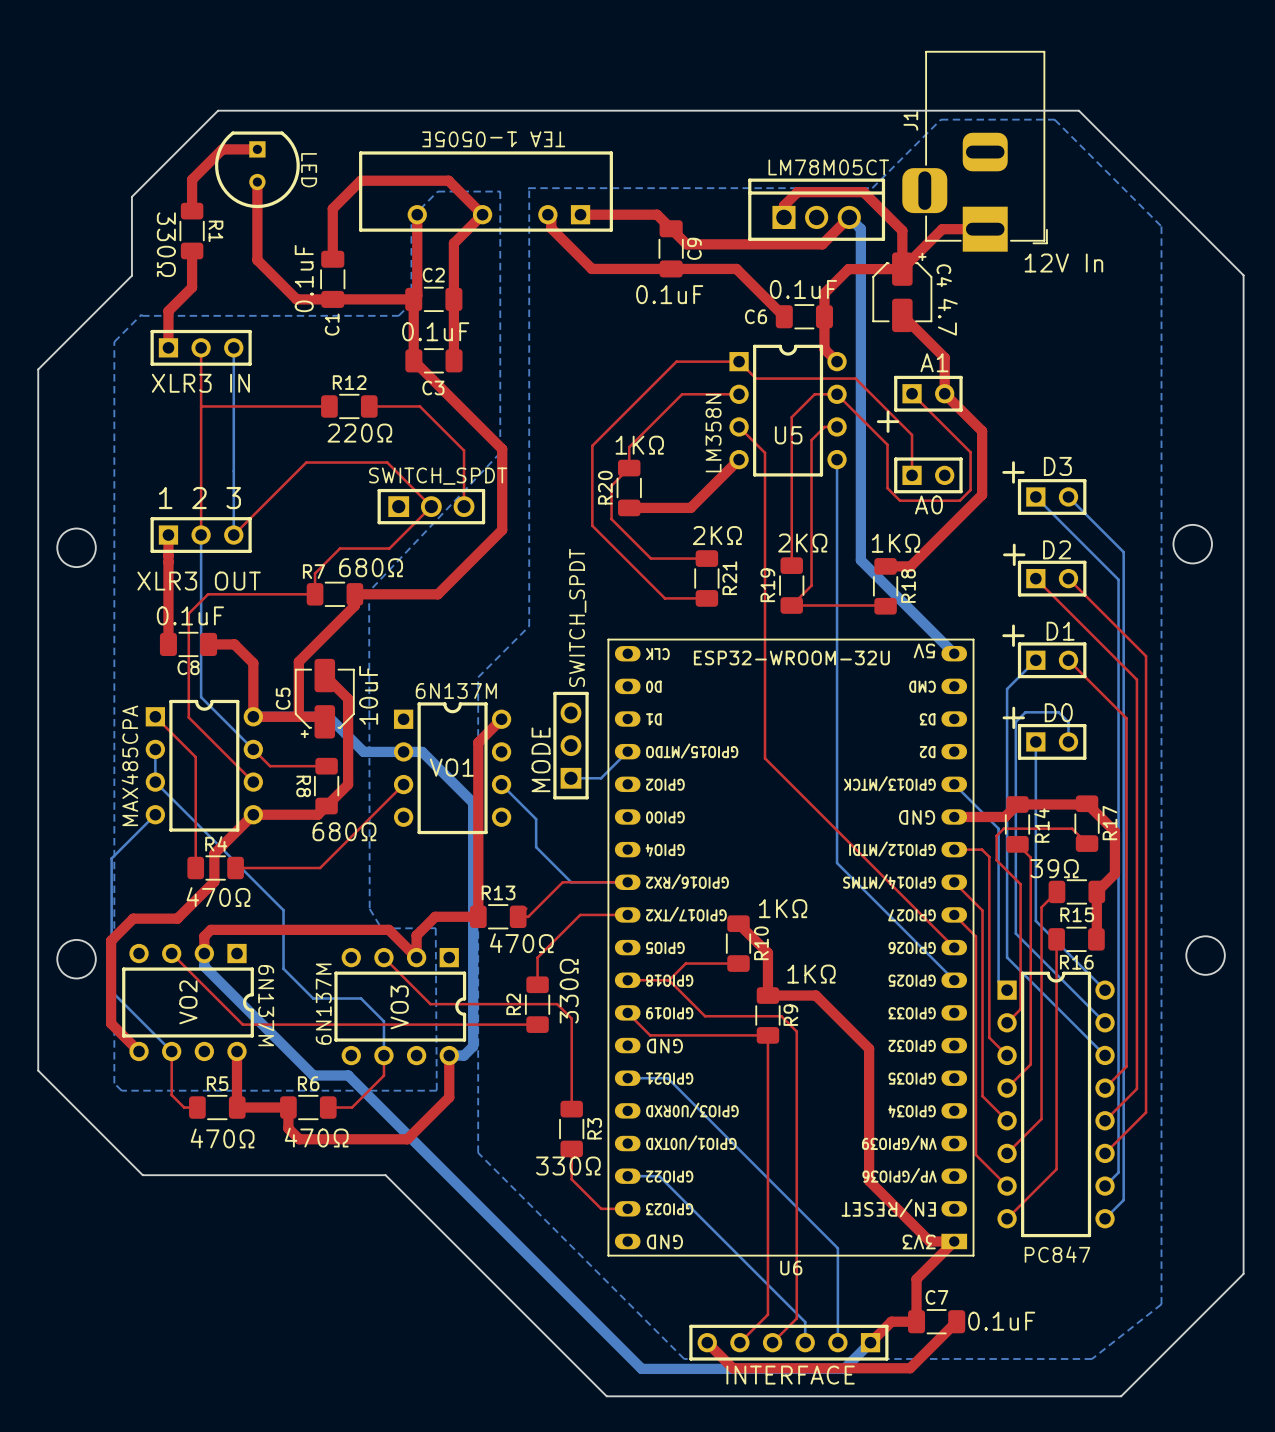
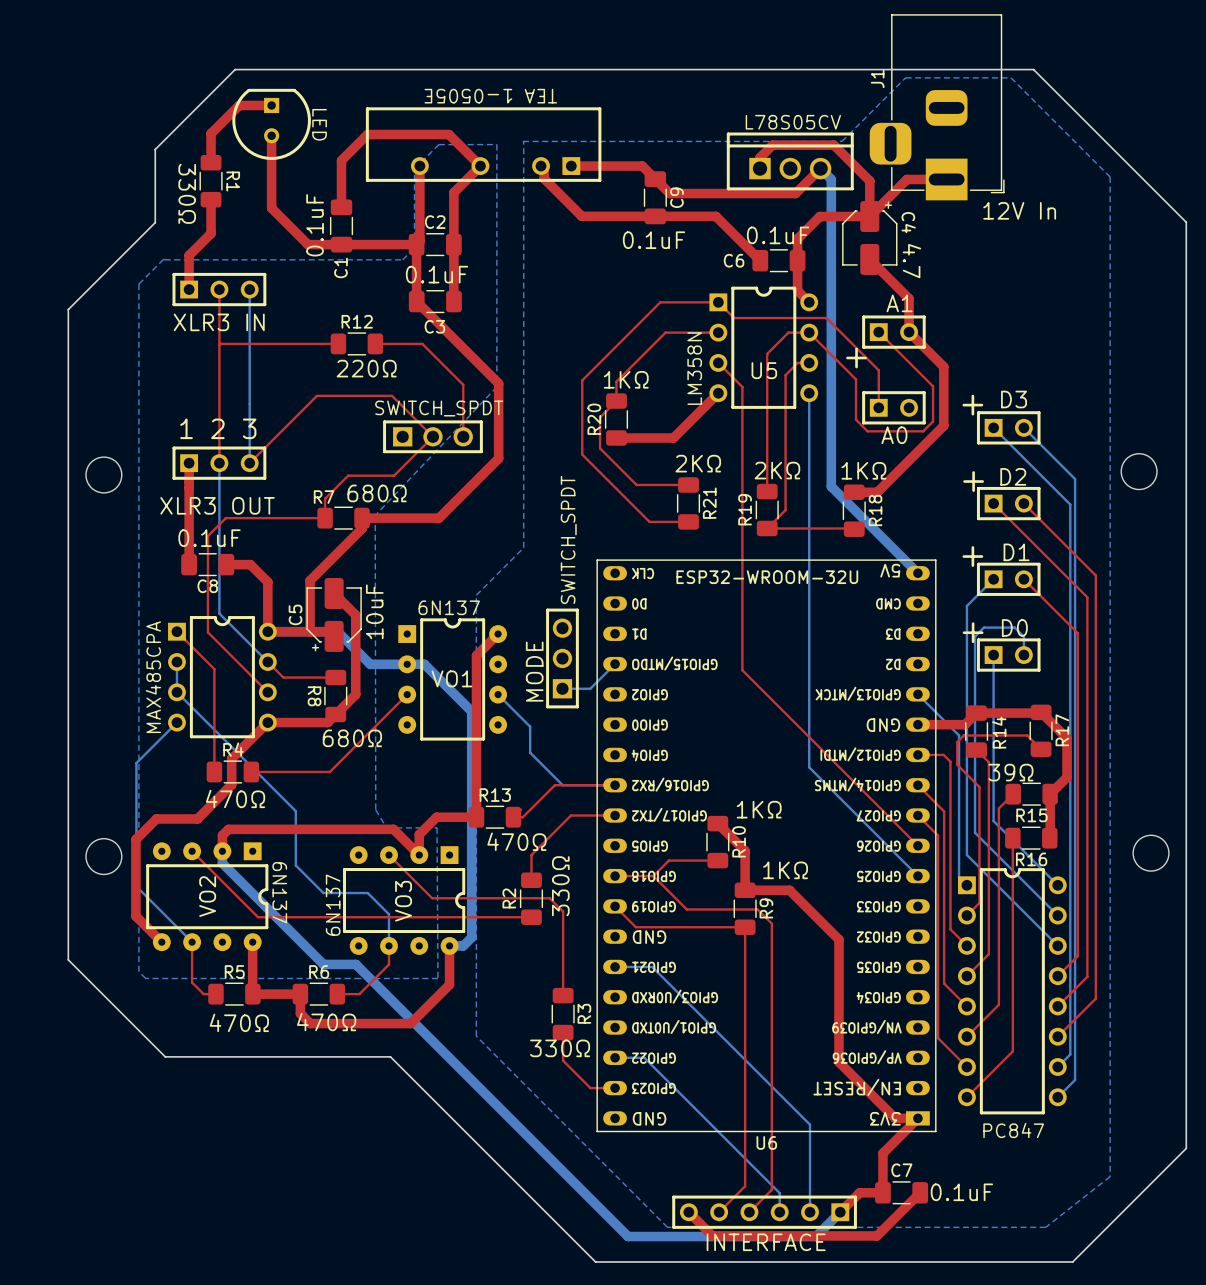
part text: LM78M05CT (828, 167) -> L78S05CV (793, 122)
VO1 footprint: [393, 702, 512, 835] -> [398, 618, 508, 741]
VO2 footprint: [122, 943, 254, 1062] -> [146, 842, 269, 952]
VO3 footprint: [334, 947, 467, 1066] -> [343, 846, 466, 955]

